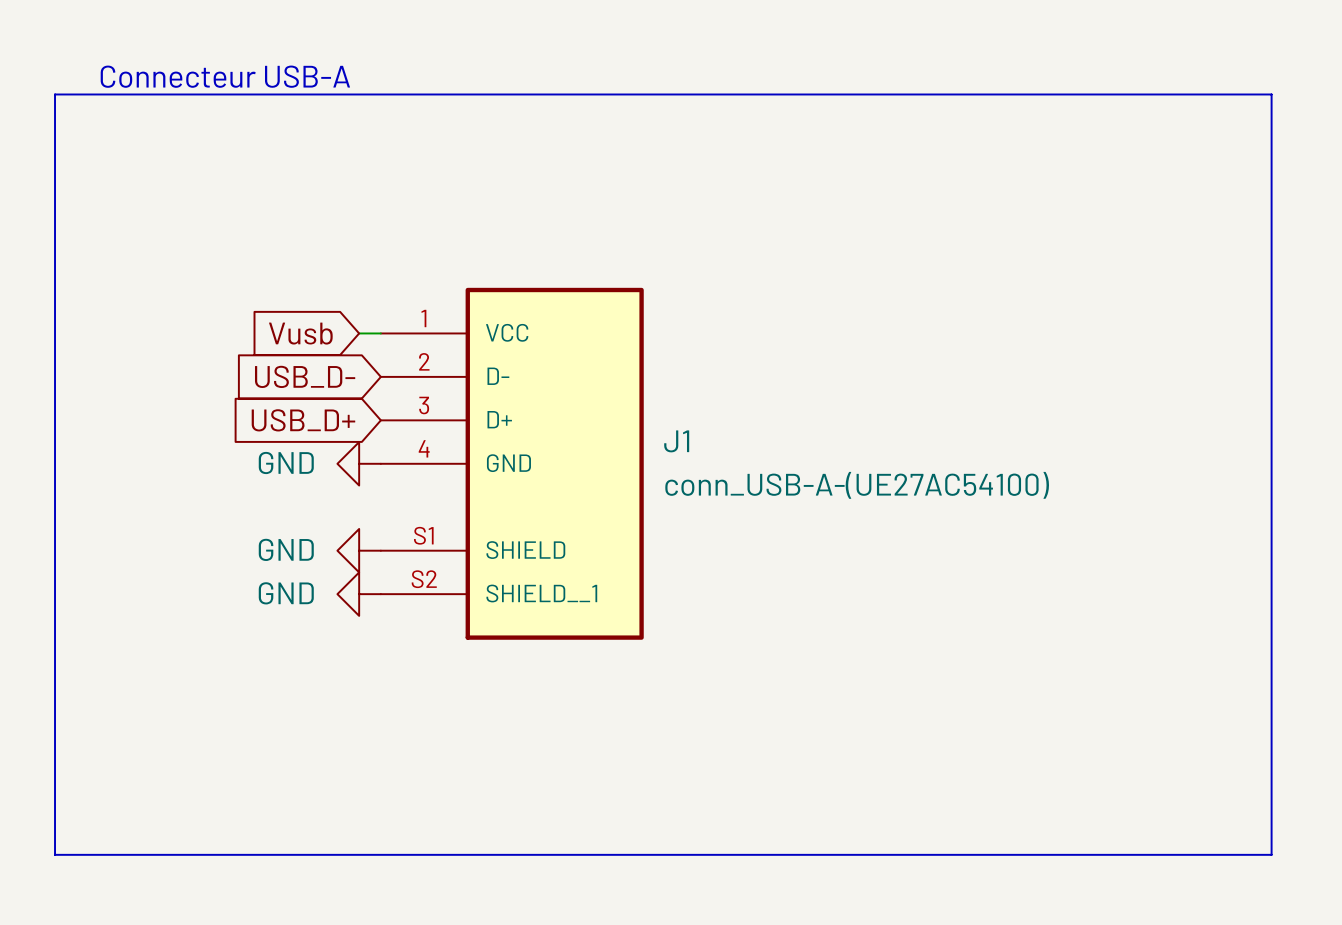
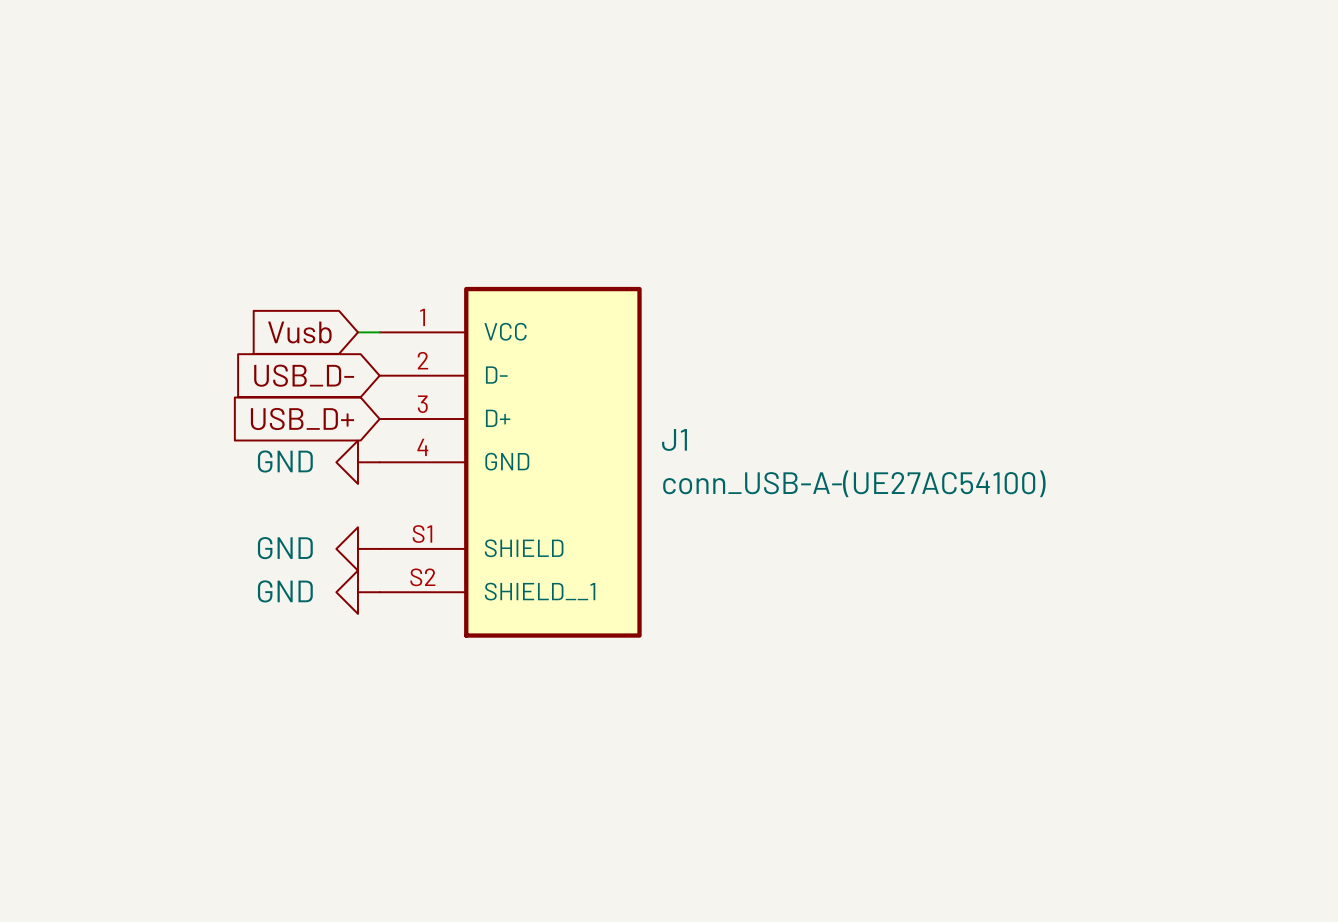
text: Connecteur USB-A (225, 76) -> none
line: (55, 94) (1271, 94) (1271, 854) (55, 854) (55, 94) -> none

